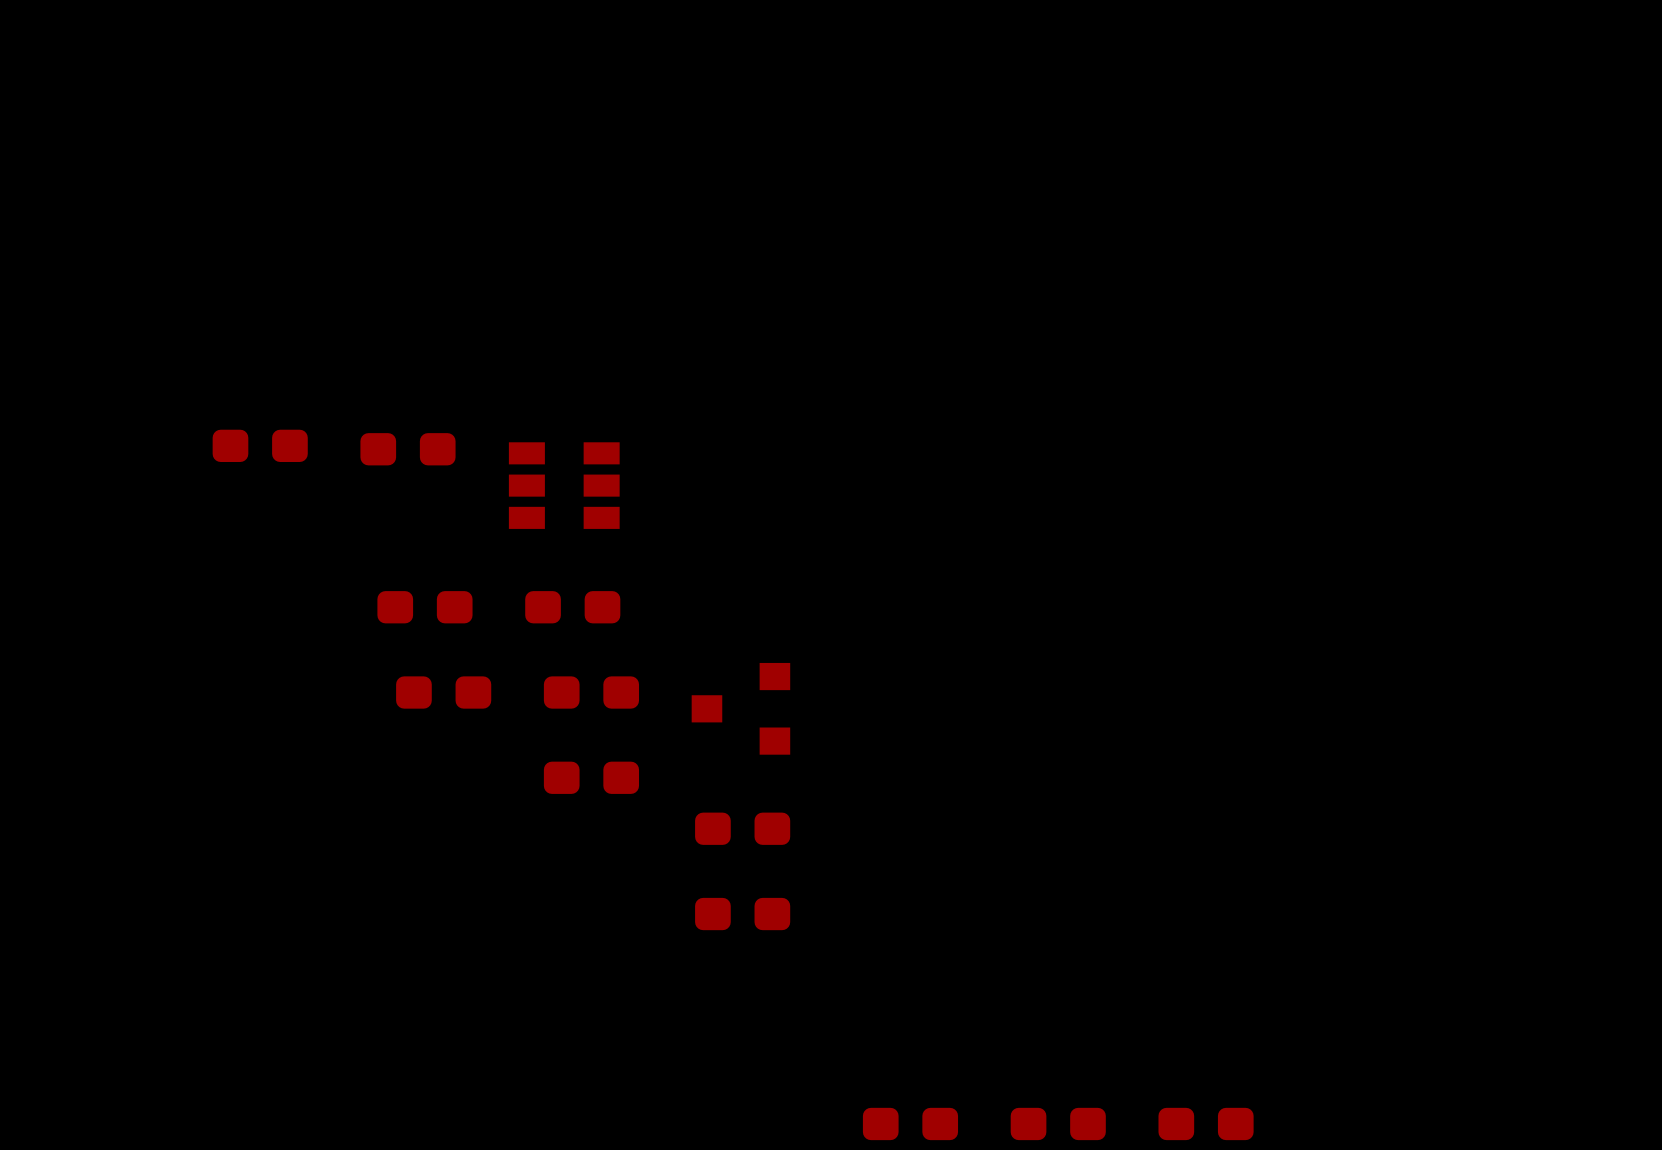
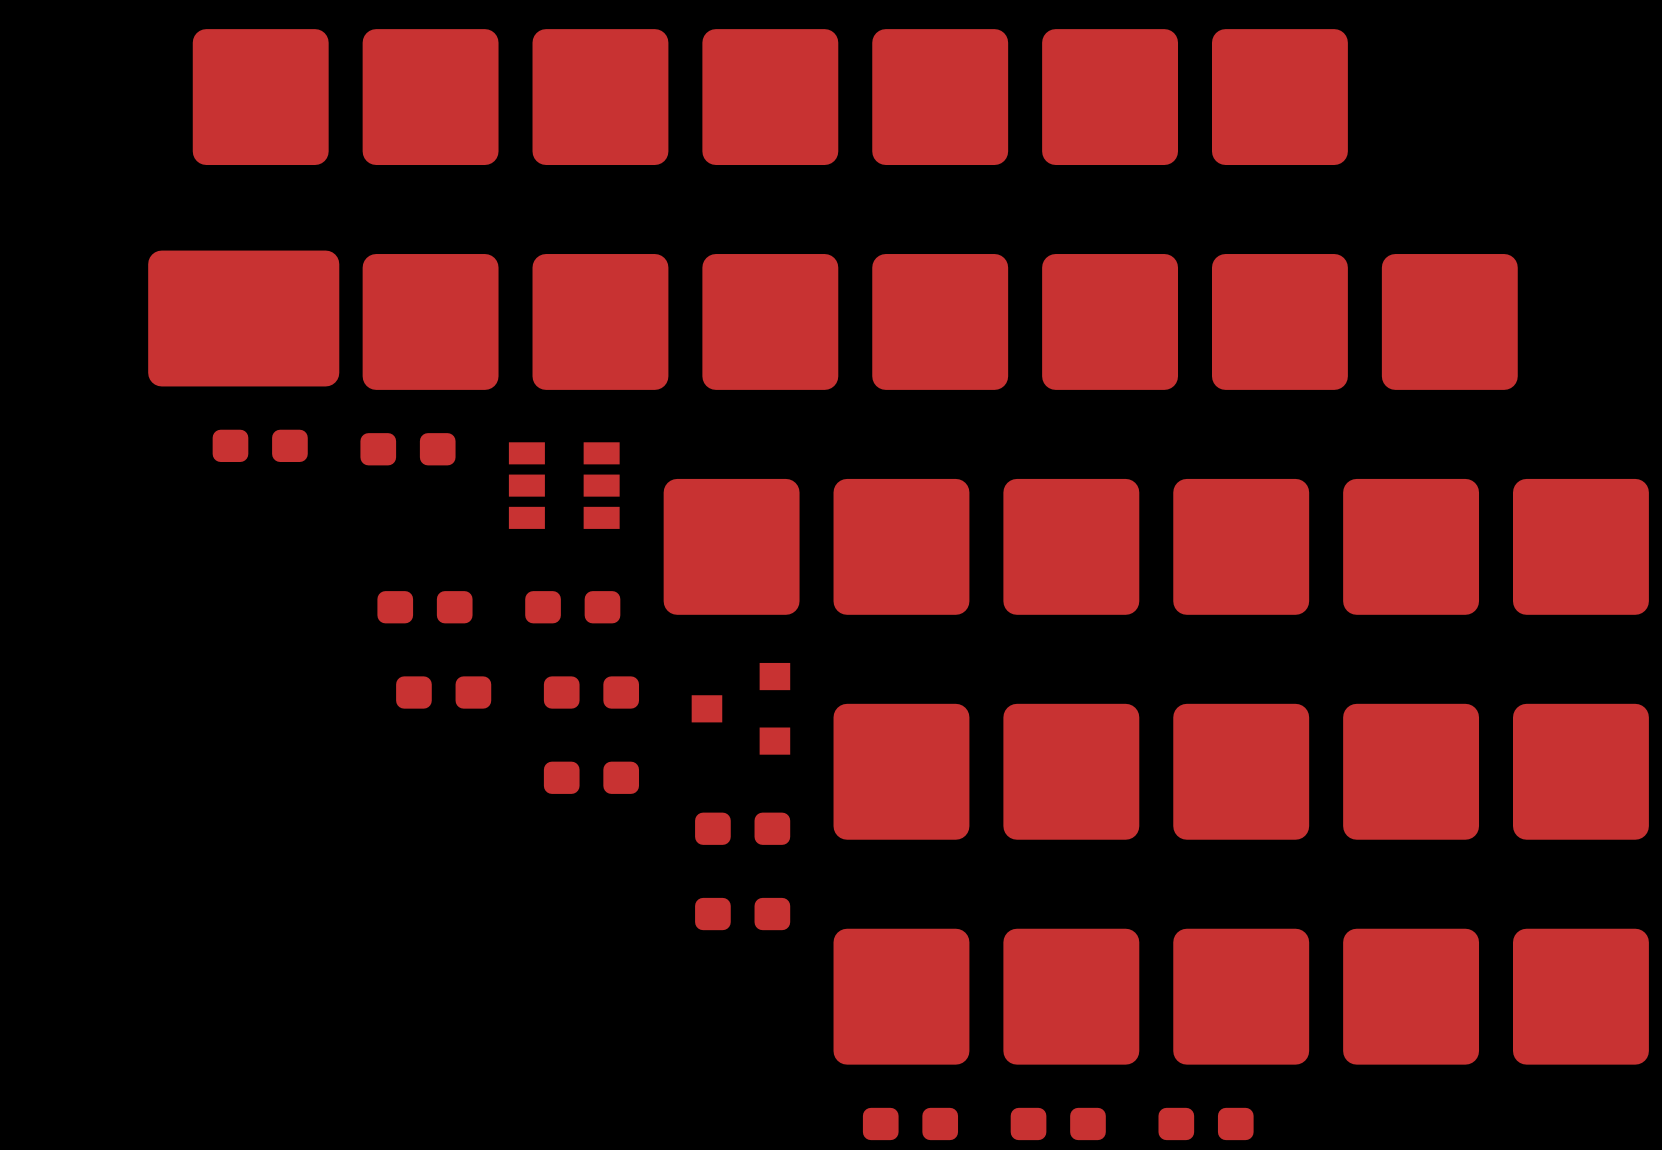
part: none -> (260, 97)
part: none -> (430, 97)
part: none -> (600, 97)
part: none -> (770, 97)
part: none -> (940, 97)
part: none -> (1110, 97)
part: none -> (1279, 97)
part: none -> (243, 318)
part: none -> (430, 321)
part: none -> (600, 321)
part: none -> (770, 321)
part: none -> (940, 321)
part: none -> (1110, 321)
part: none -> (1279, 321)
part: none -> (1449, 321)
part: none -> (731, 546)
part: none -> (901, 546)
part: none -> (1071, 546)
part: none -> (1241, 546)
part: none -> (1411, 546)
part: none -> (1580, 546)
part: none -> (901, 771)
part: none -> (1071, 771)
part: none -> (1241, 771)
part: none -> (1411, 771)
part: none -> (1580, 771)
part: none -> (901, 996)
part: none -> (1071, 996)
part: none -> (1241, 996)
part: none -> (1411, 996)
part: none -> (1580, 996)

